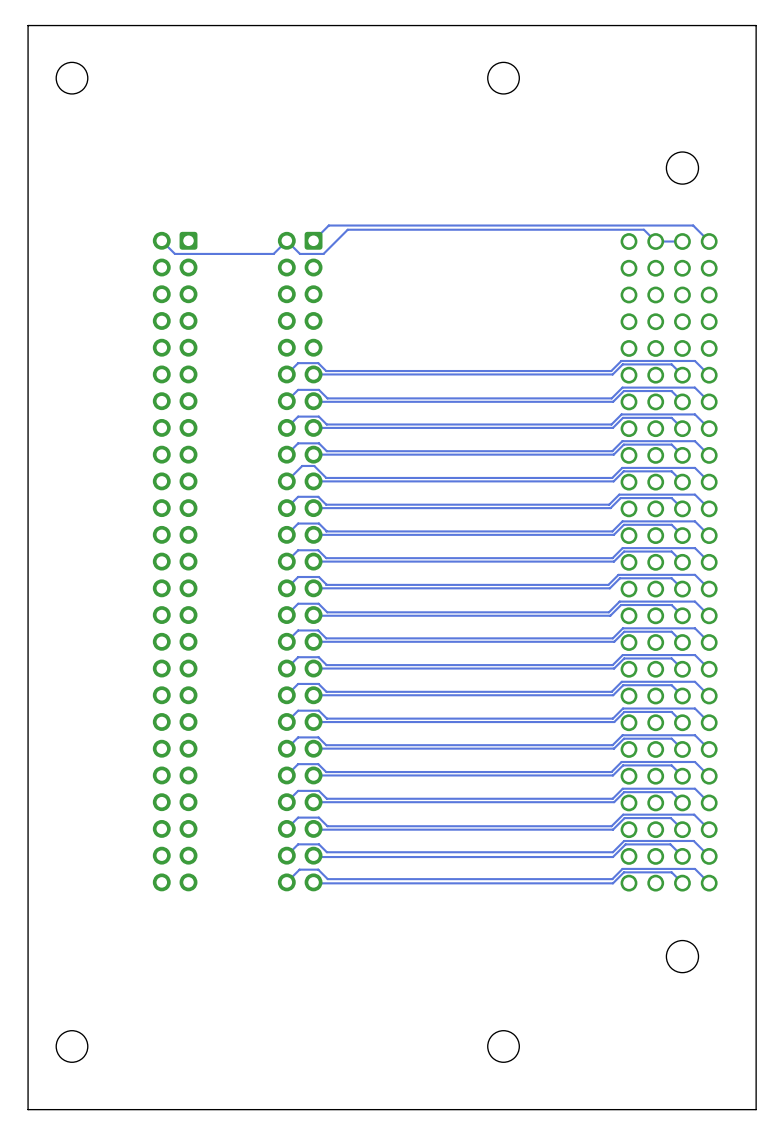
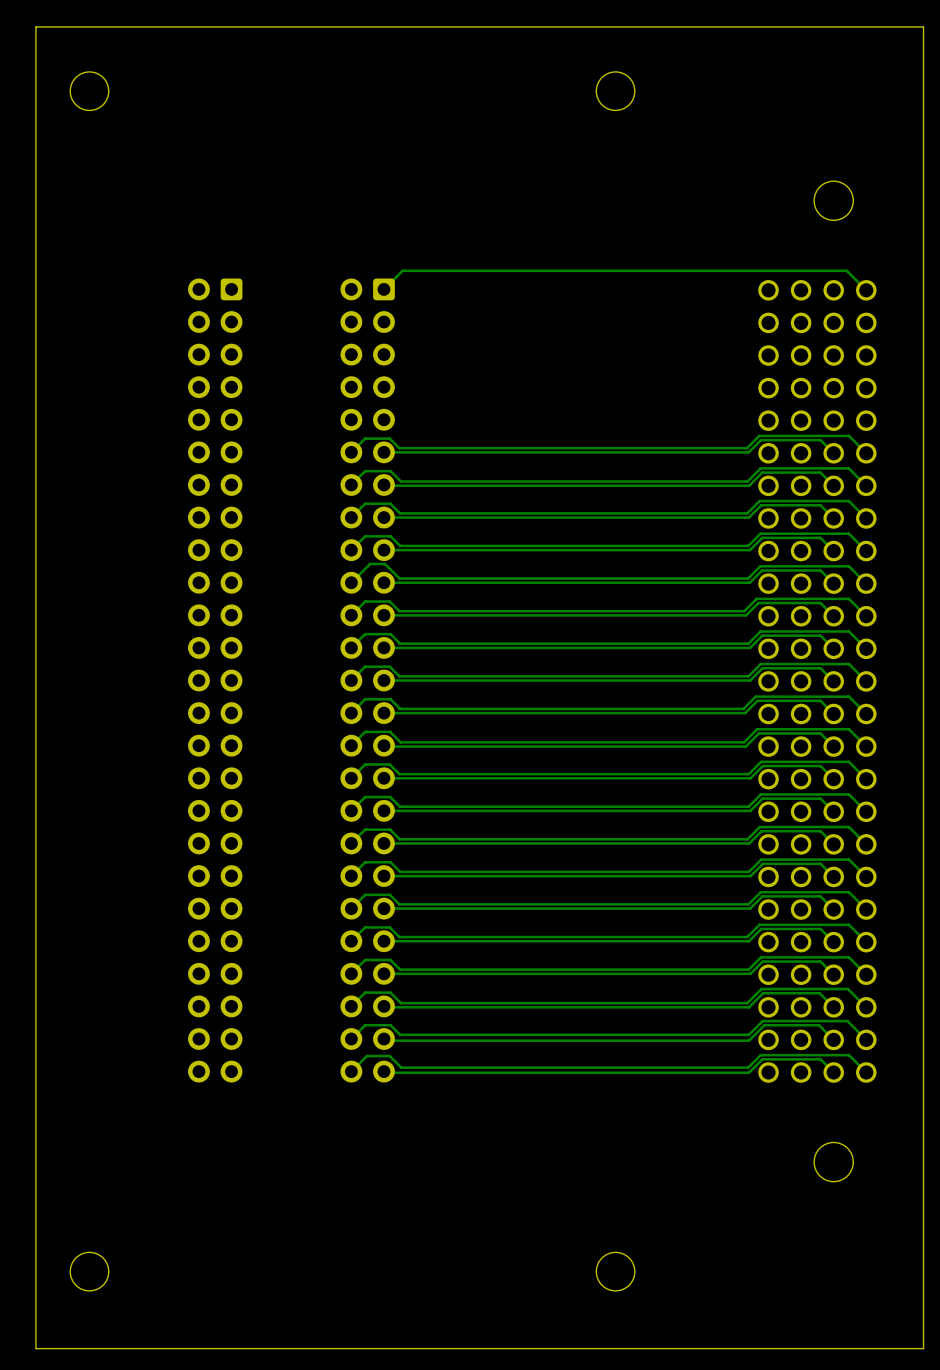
track: (161, 240) (174, 253) (273, 253) (286, 240) (299, 253) (323, 253) (347, 229) (643, 229) (655, 241) (682, 241) -> none

